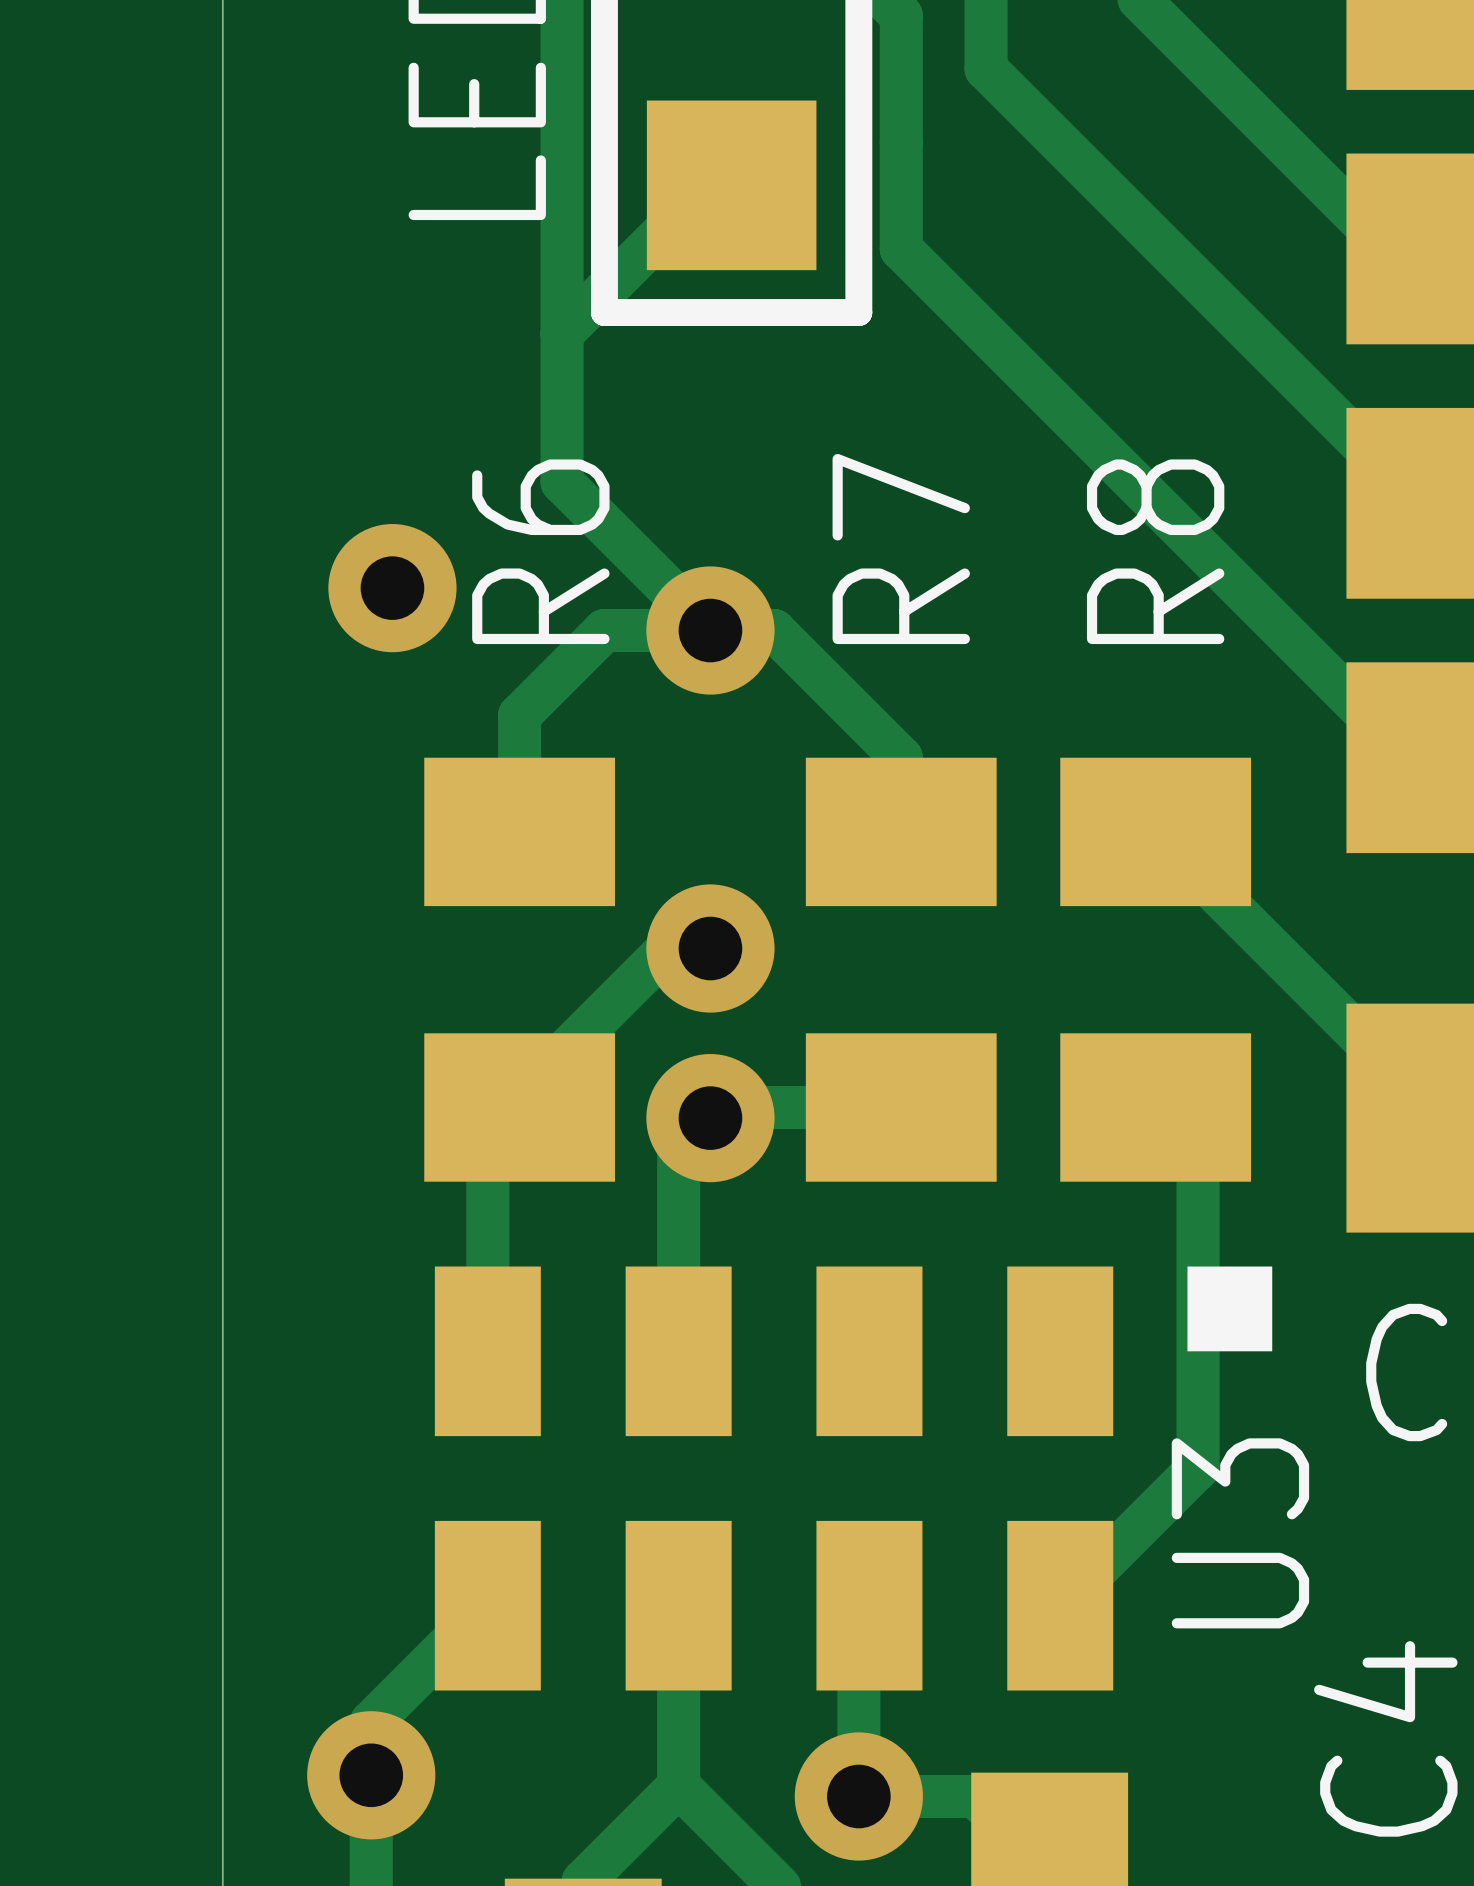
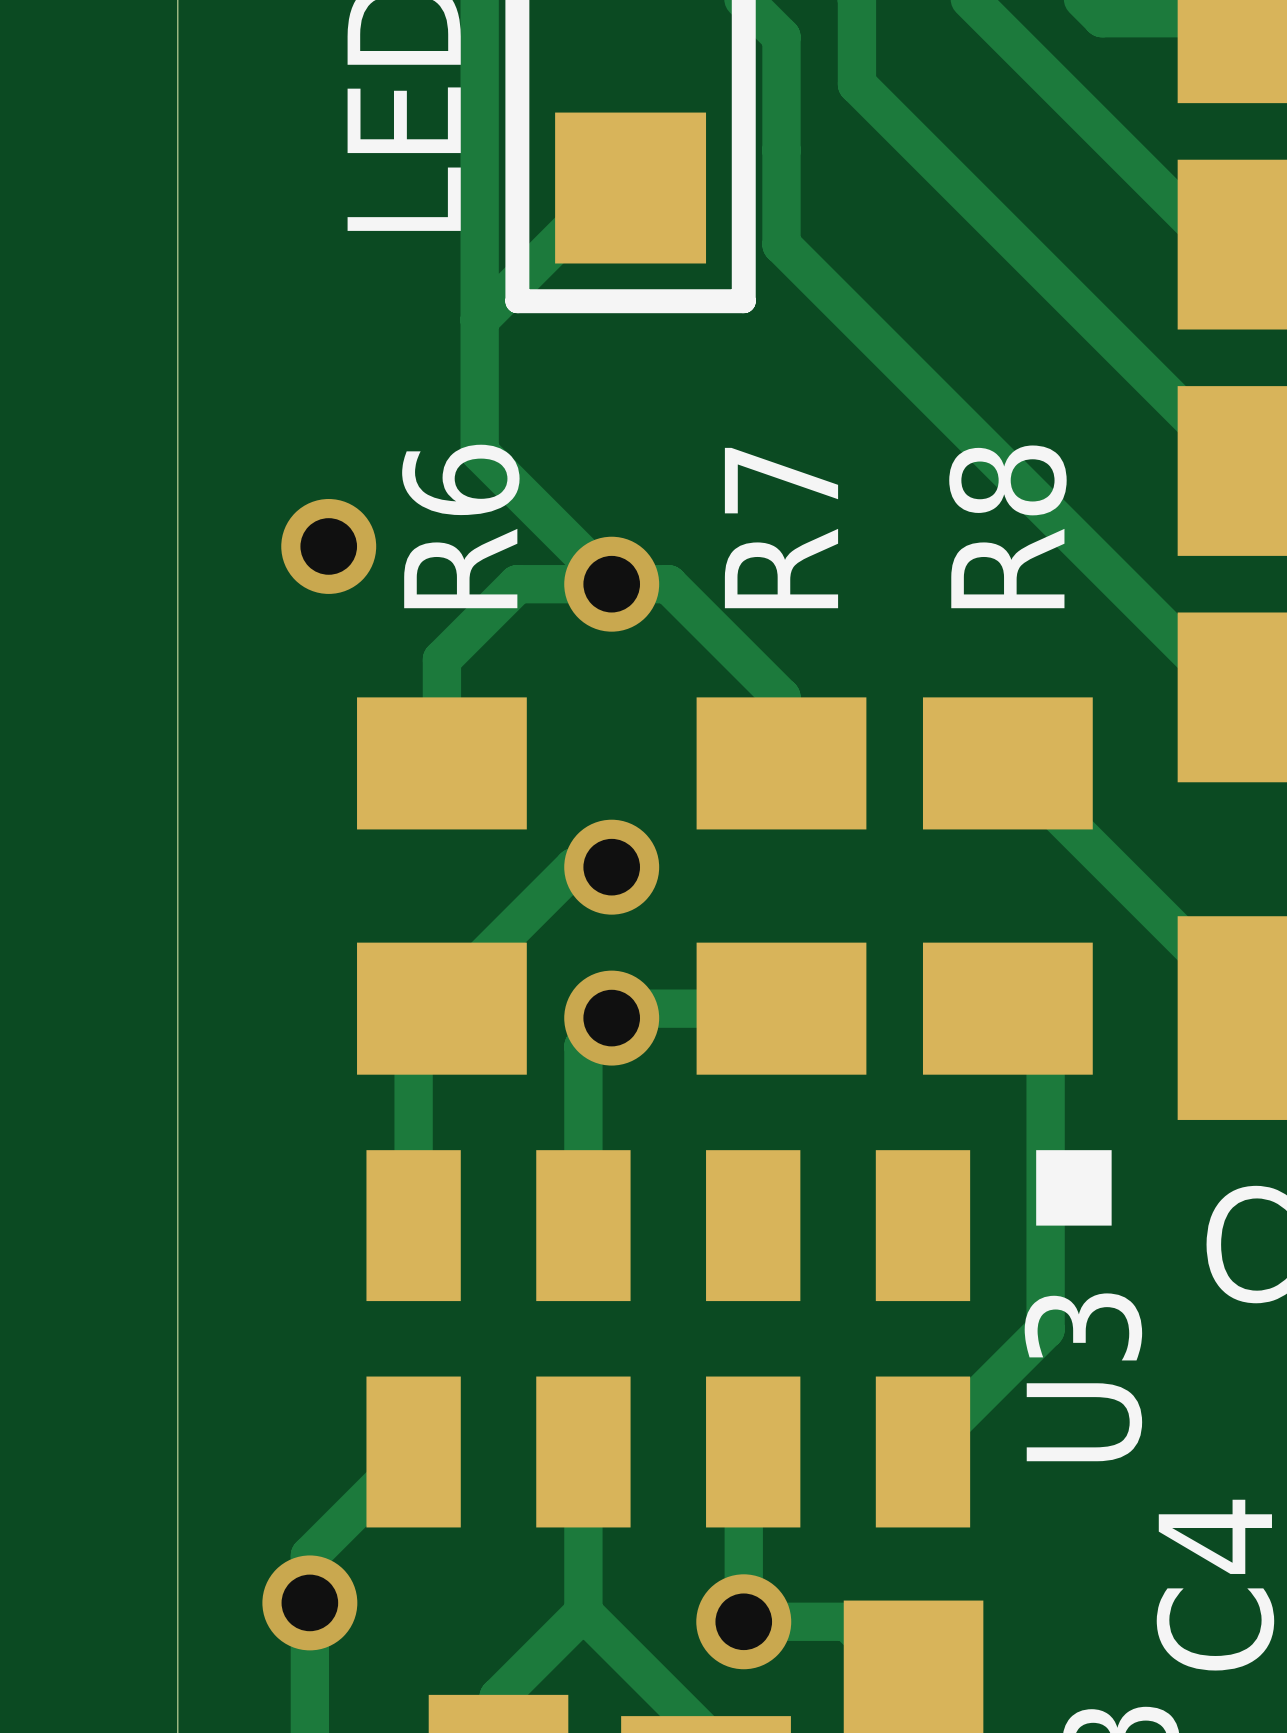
via size: [328, 524, 457, 653] -> [281, 499, 377, 594]
via size: [646, 566, 775, 695] -> [564, 536, 660, 632]
via size: [646, 884, 775, 1013] -> [564, 819, 660, 915]
via size: [646, 1054, 775, 1183] -> [564, 970, 660, 1066]
via size: [307, 1711, 436, 1840] -> [262, 1555, 358, 1651]
via size: [794, 1732, 923, 1861] -> [696, 1574, 792, 1670]

